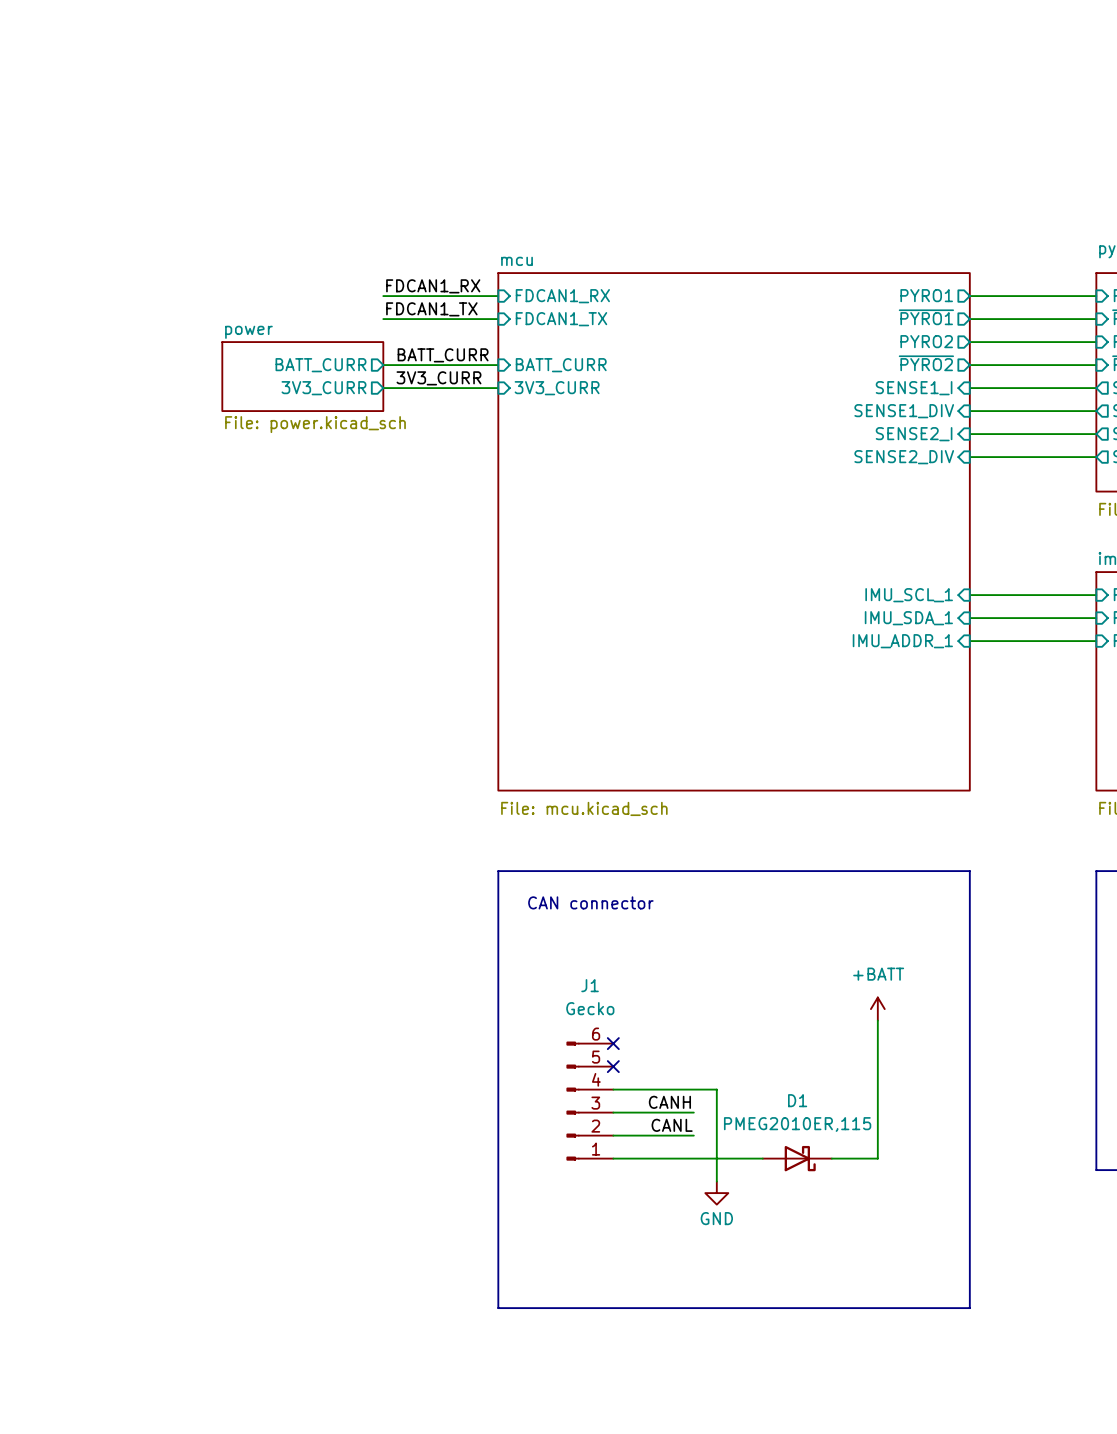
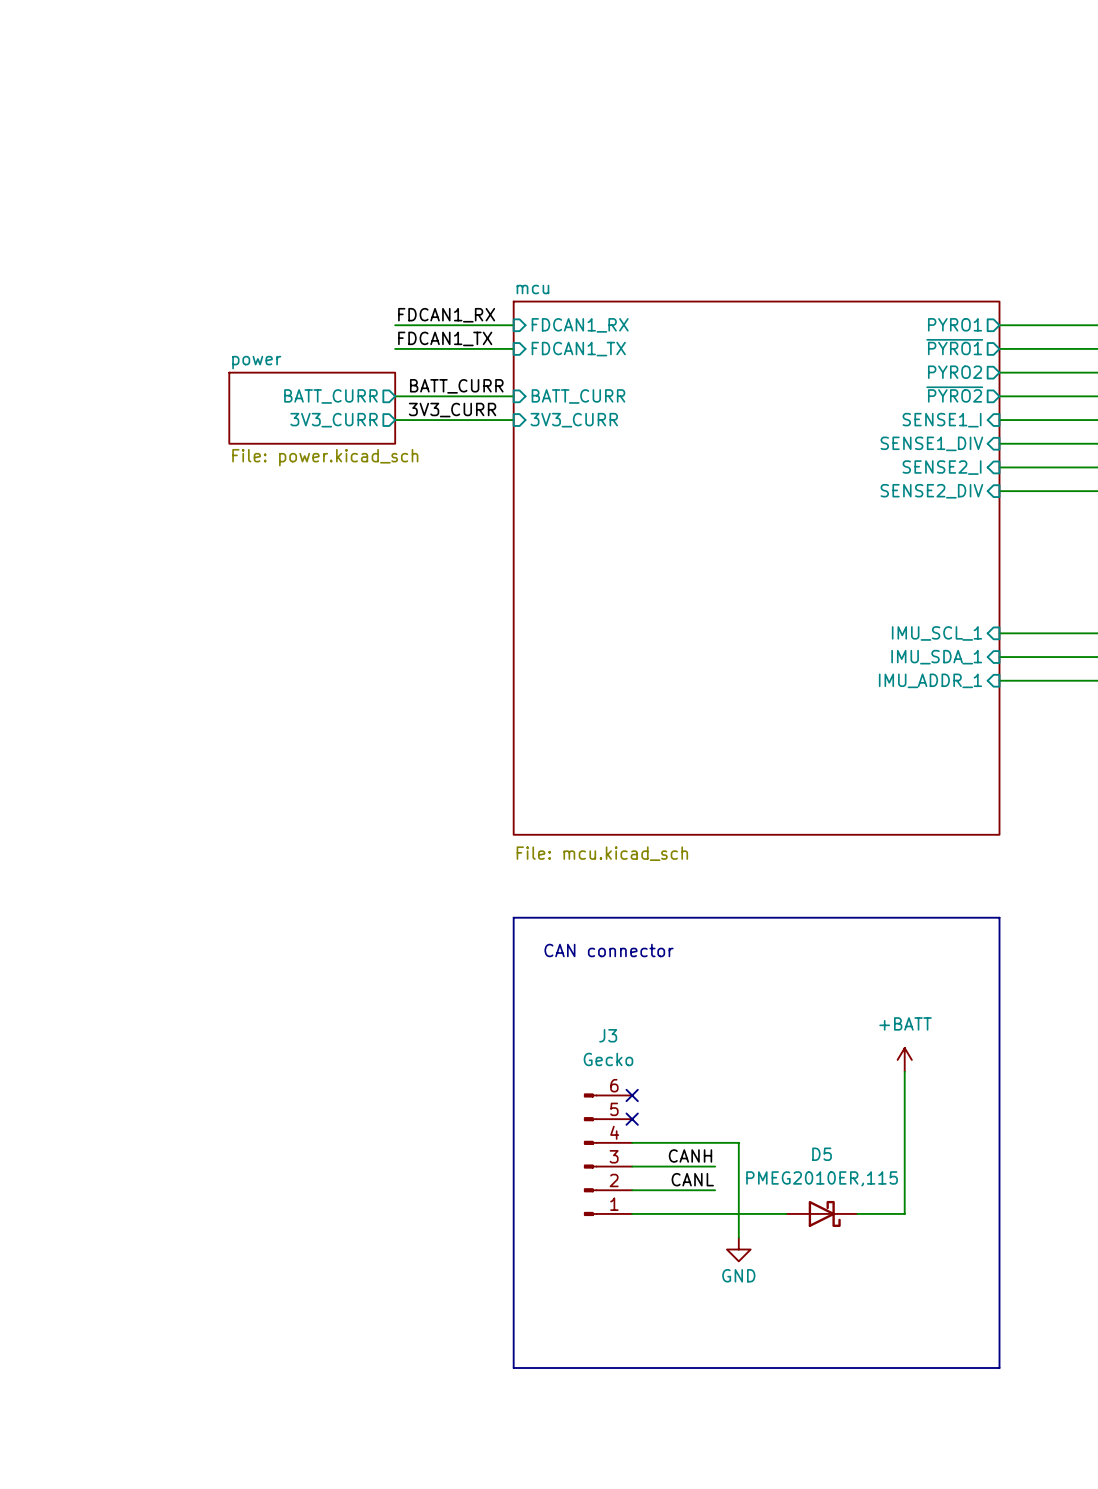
J1 name: J1 (590, 985) -> J3 (608, 1035)
D1 name: D1 (797, 1100) -> D5 (822, 1154)

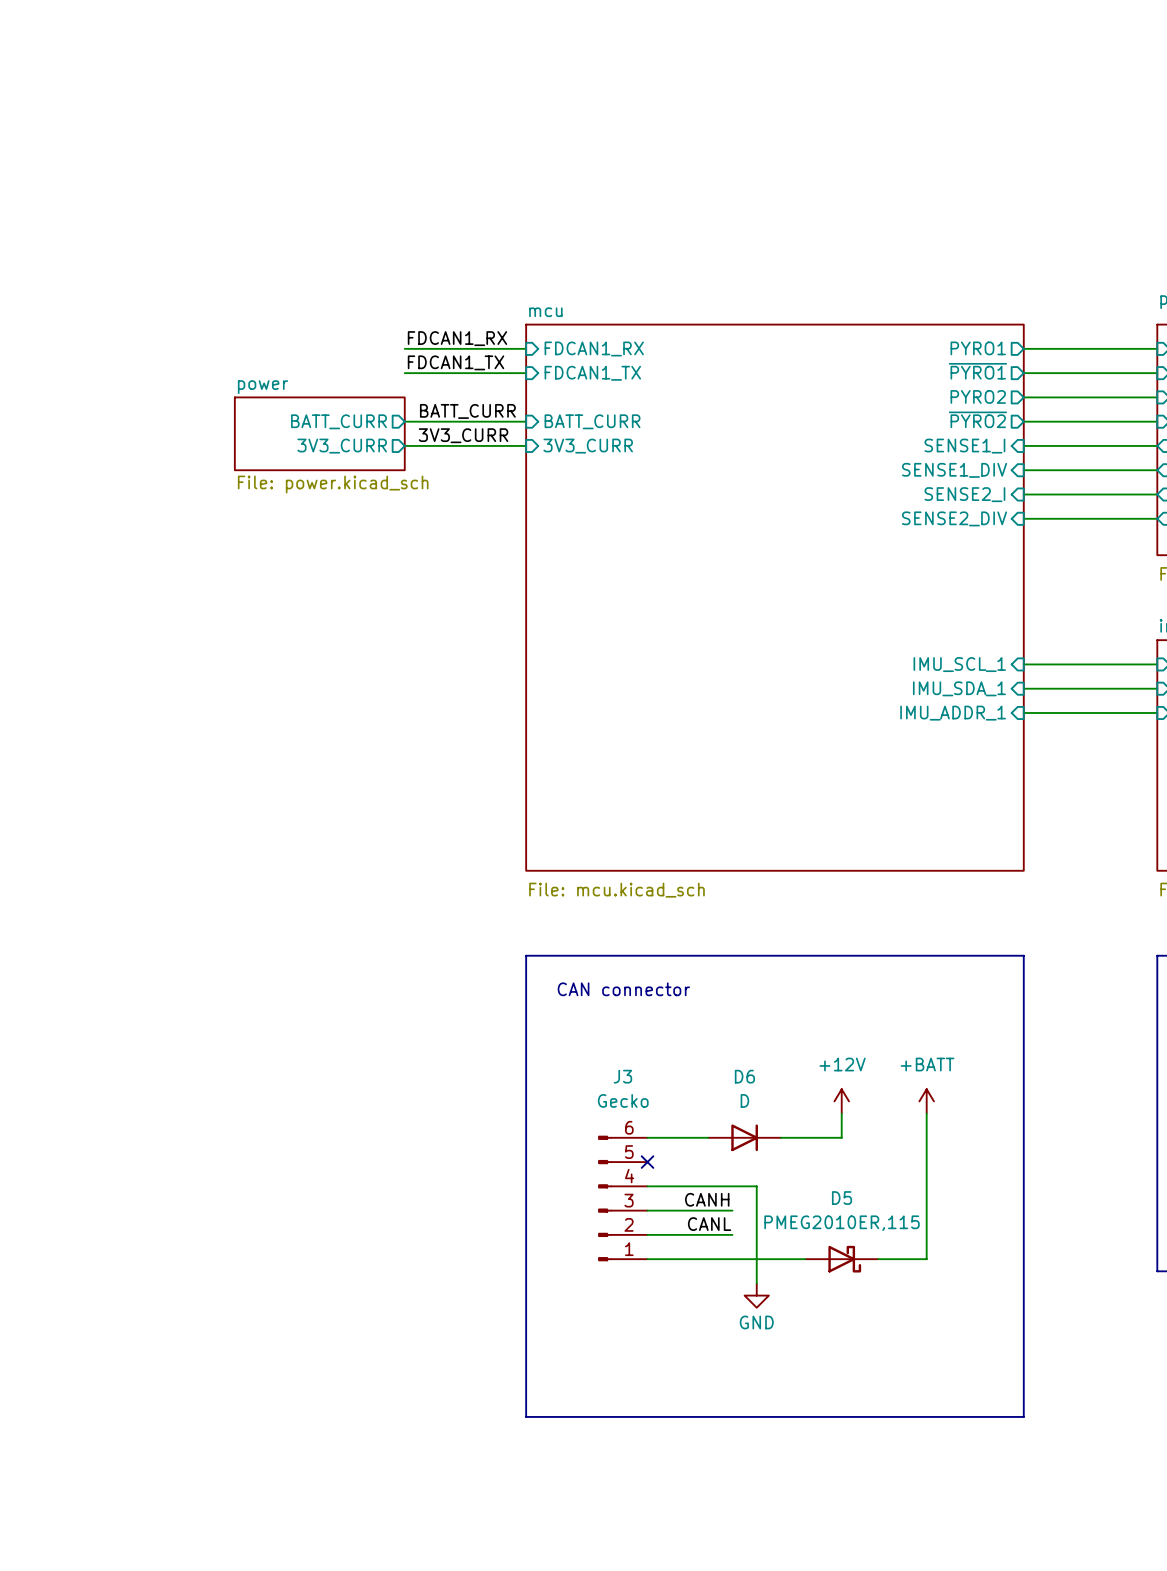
power symbol: none -> +12V (841, 1101)
wire: none -> (841, 1113) (841, 1137) (781, 1137)
wire: none -> (647, 1137) (708, 1137)
no-connect mark: (632, 1095) -> none
D6: none -> D (744, 1137)

